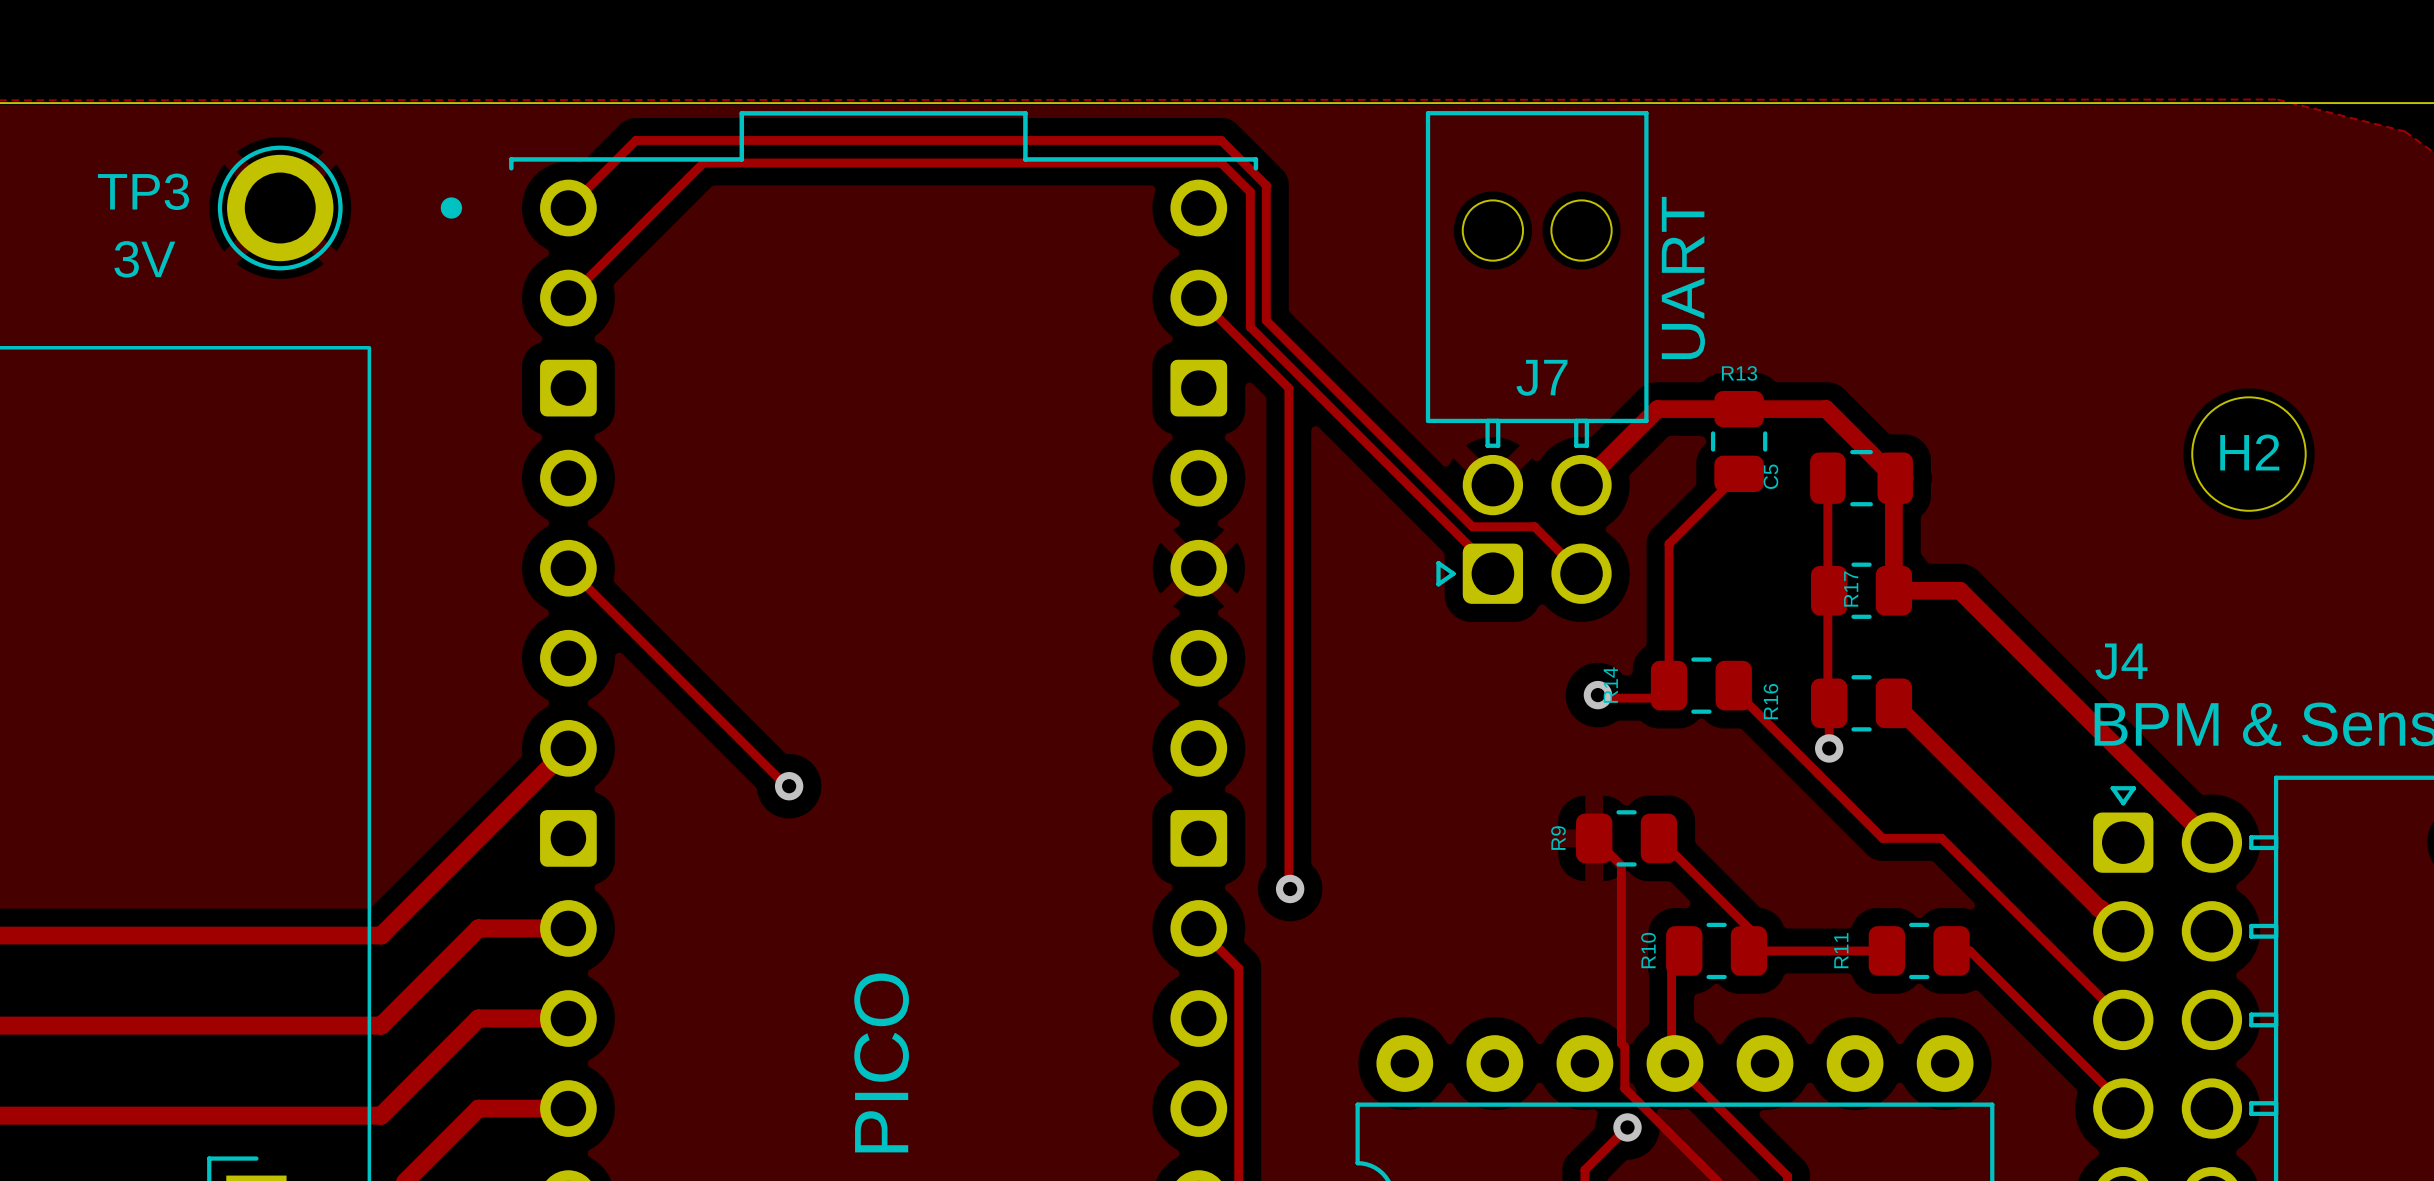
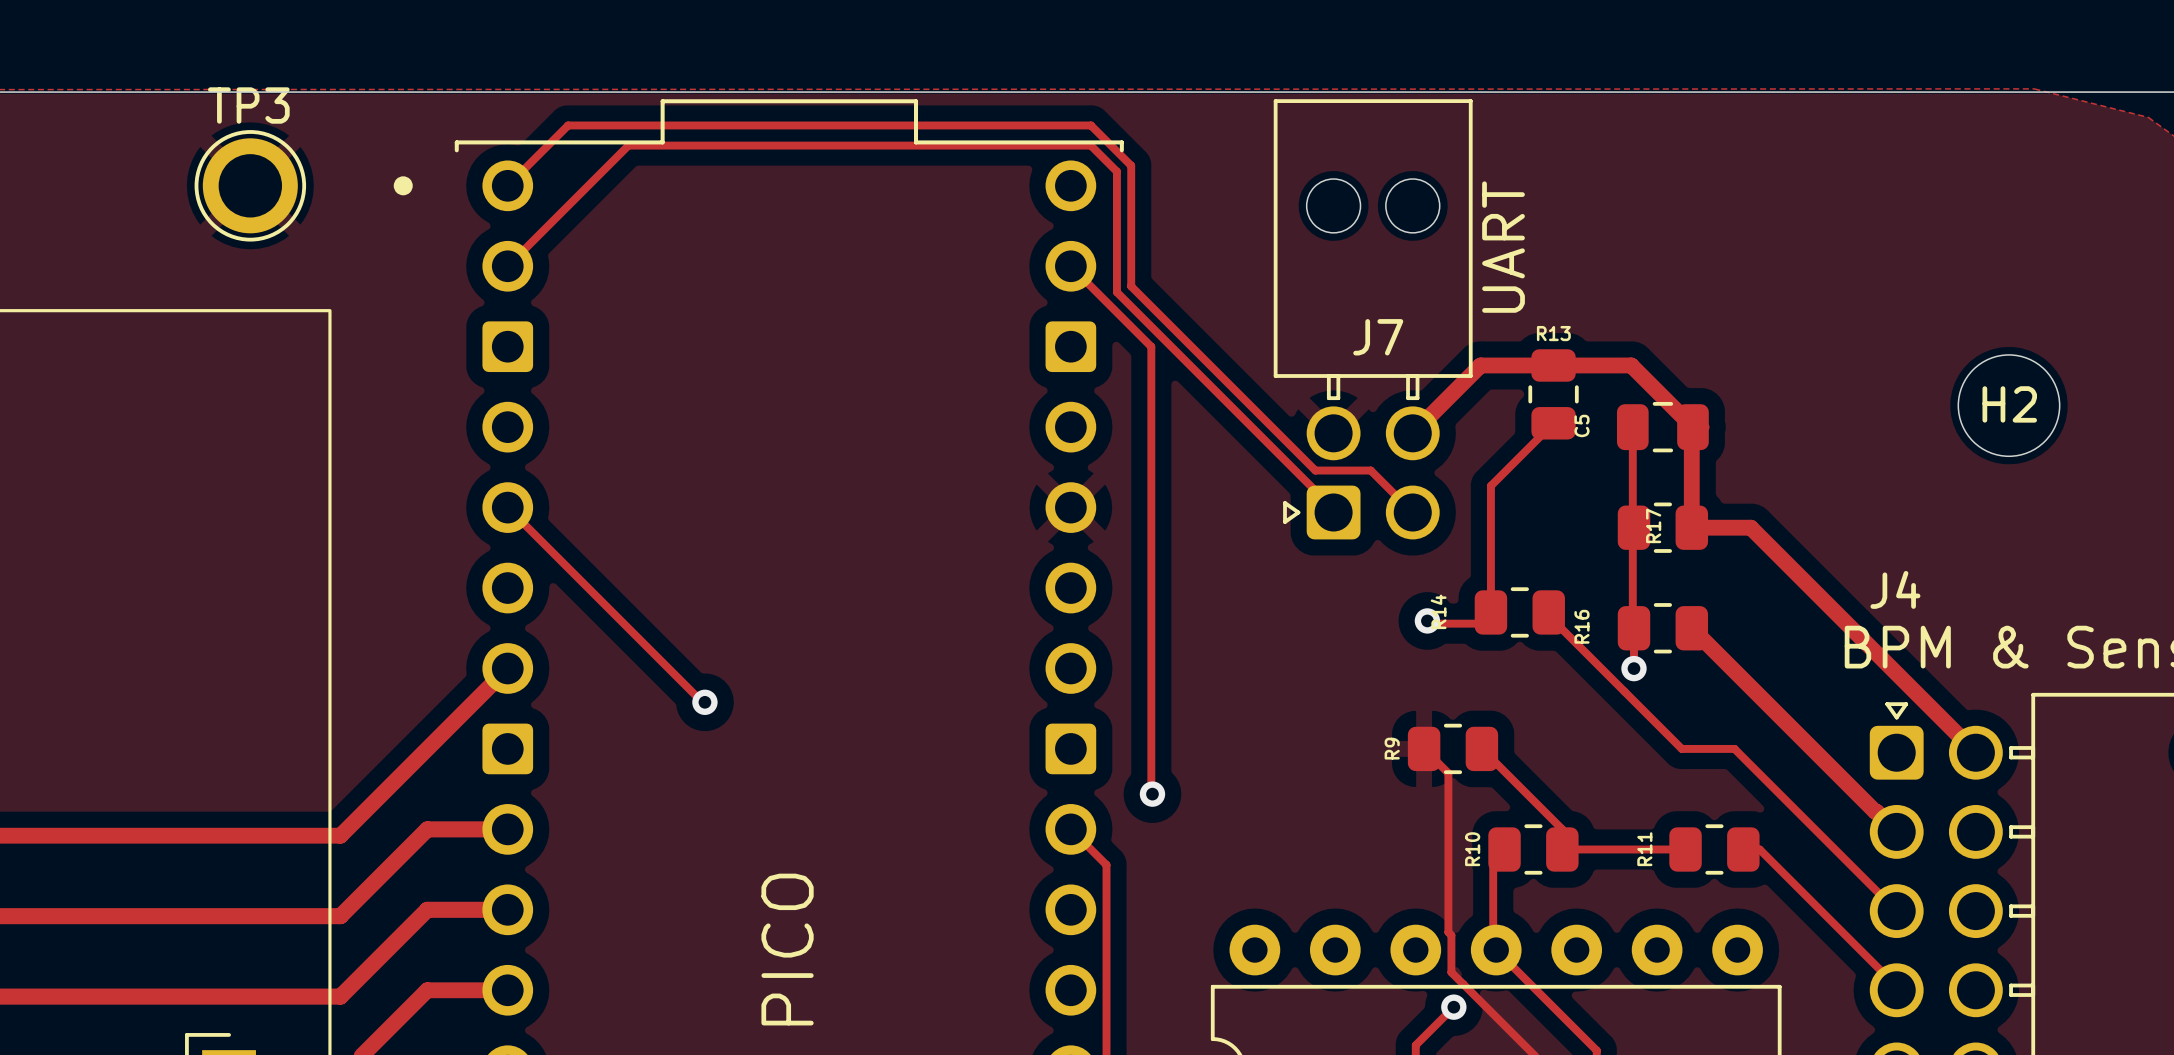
TP3 name position: TP3 (143, 191) -> TP3 (248, 105)
text: 3V (144, 259) -> none

